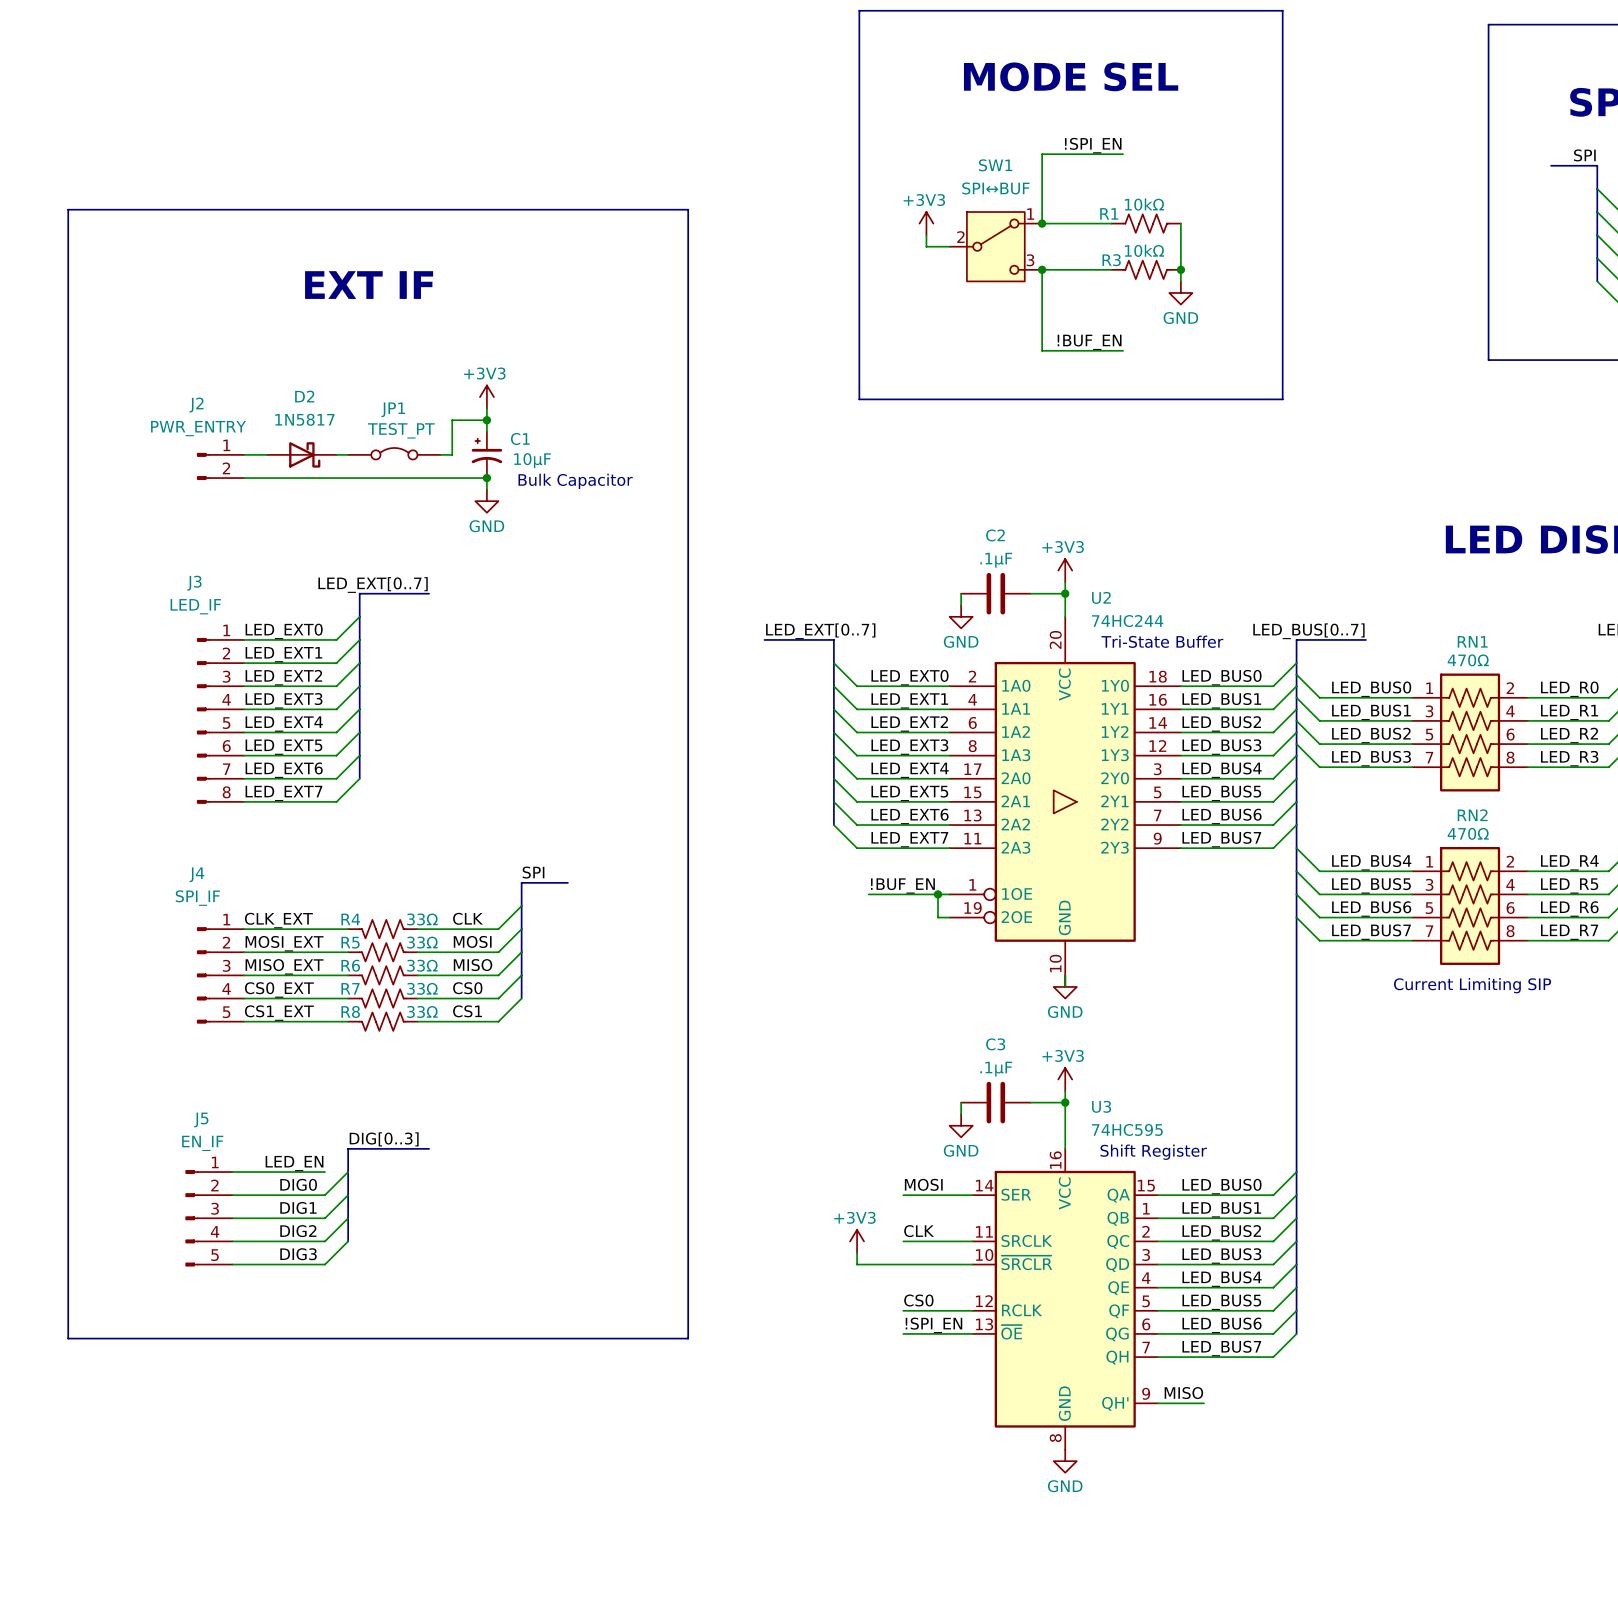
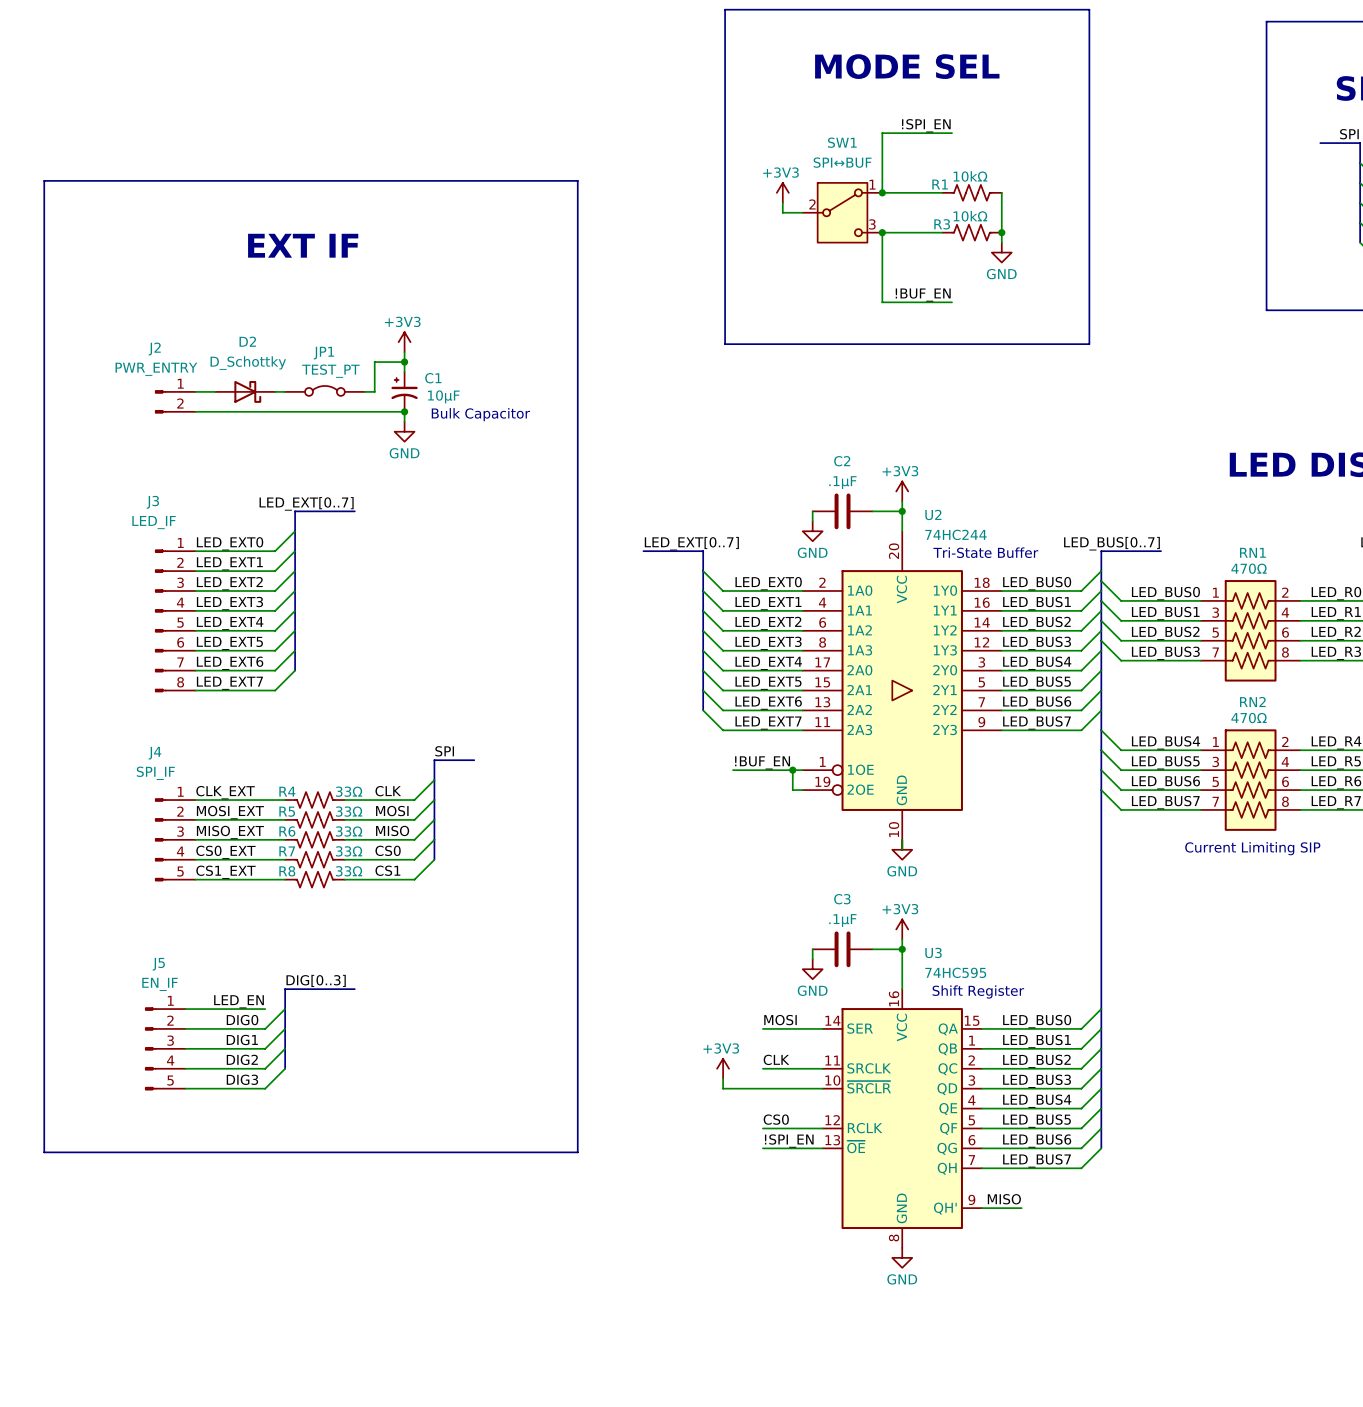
D2 value: 1N5817 (304, 419) -> D_Schottky (248, 363)

